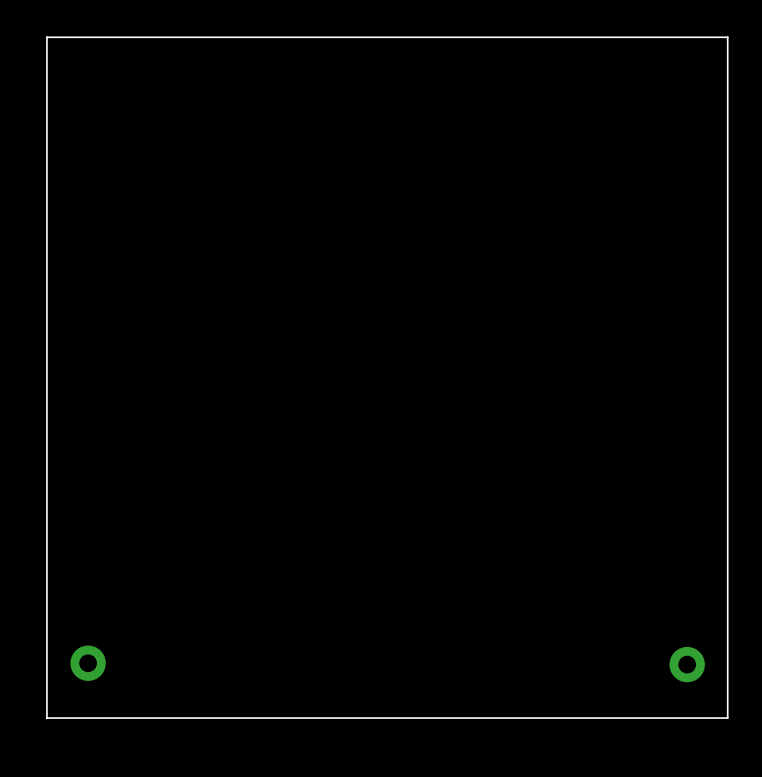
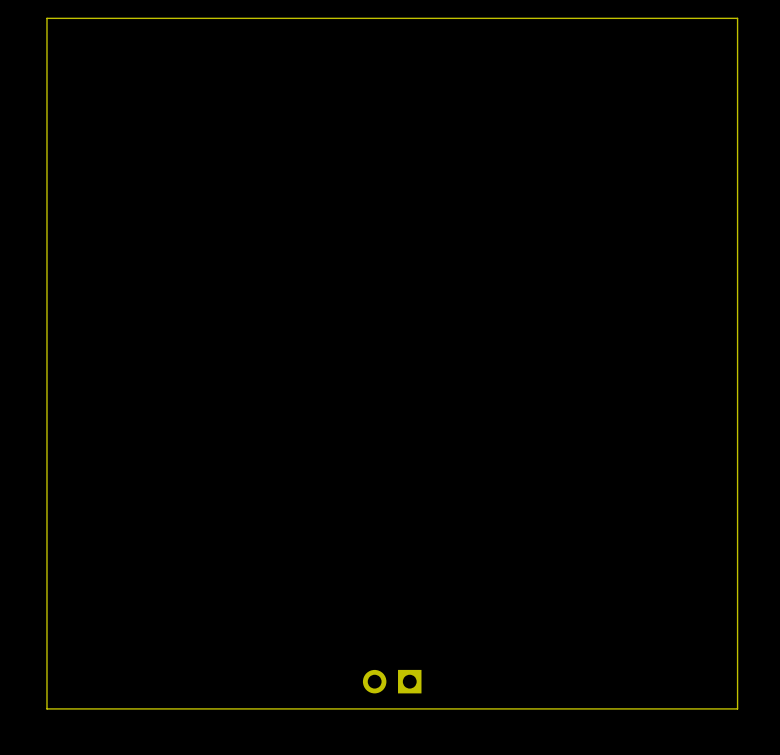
part: (88, 663) -> none
part: (687, 664) -> none
part: none -> (392, 681)

